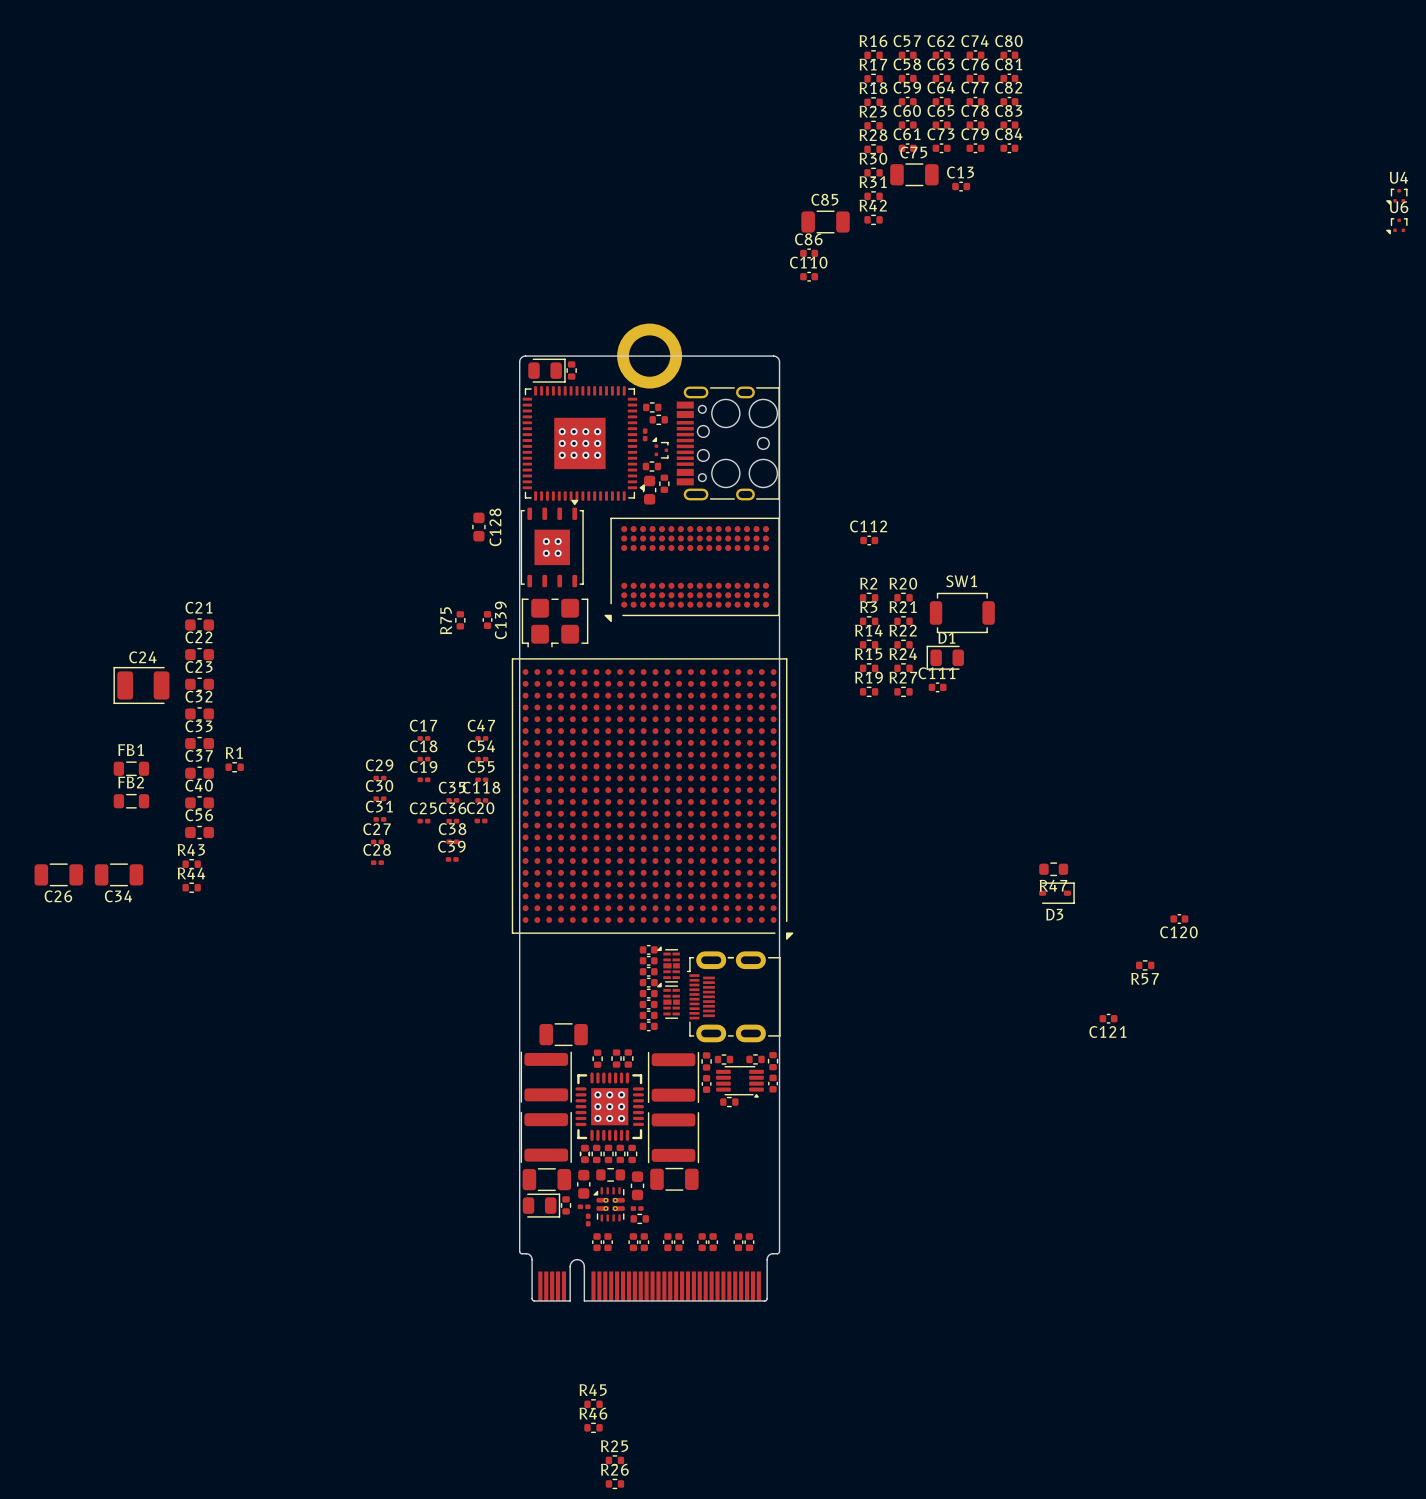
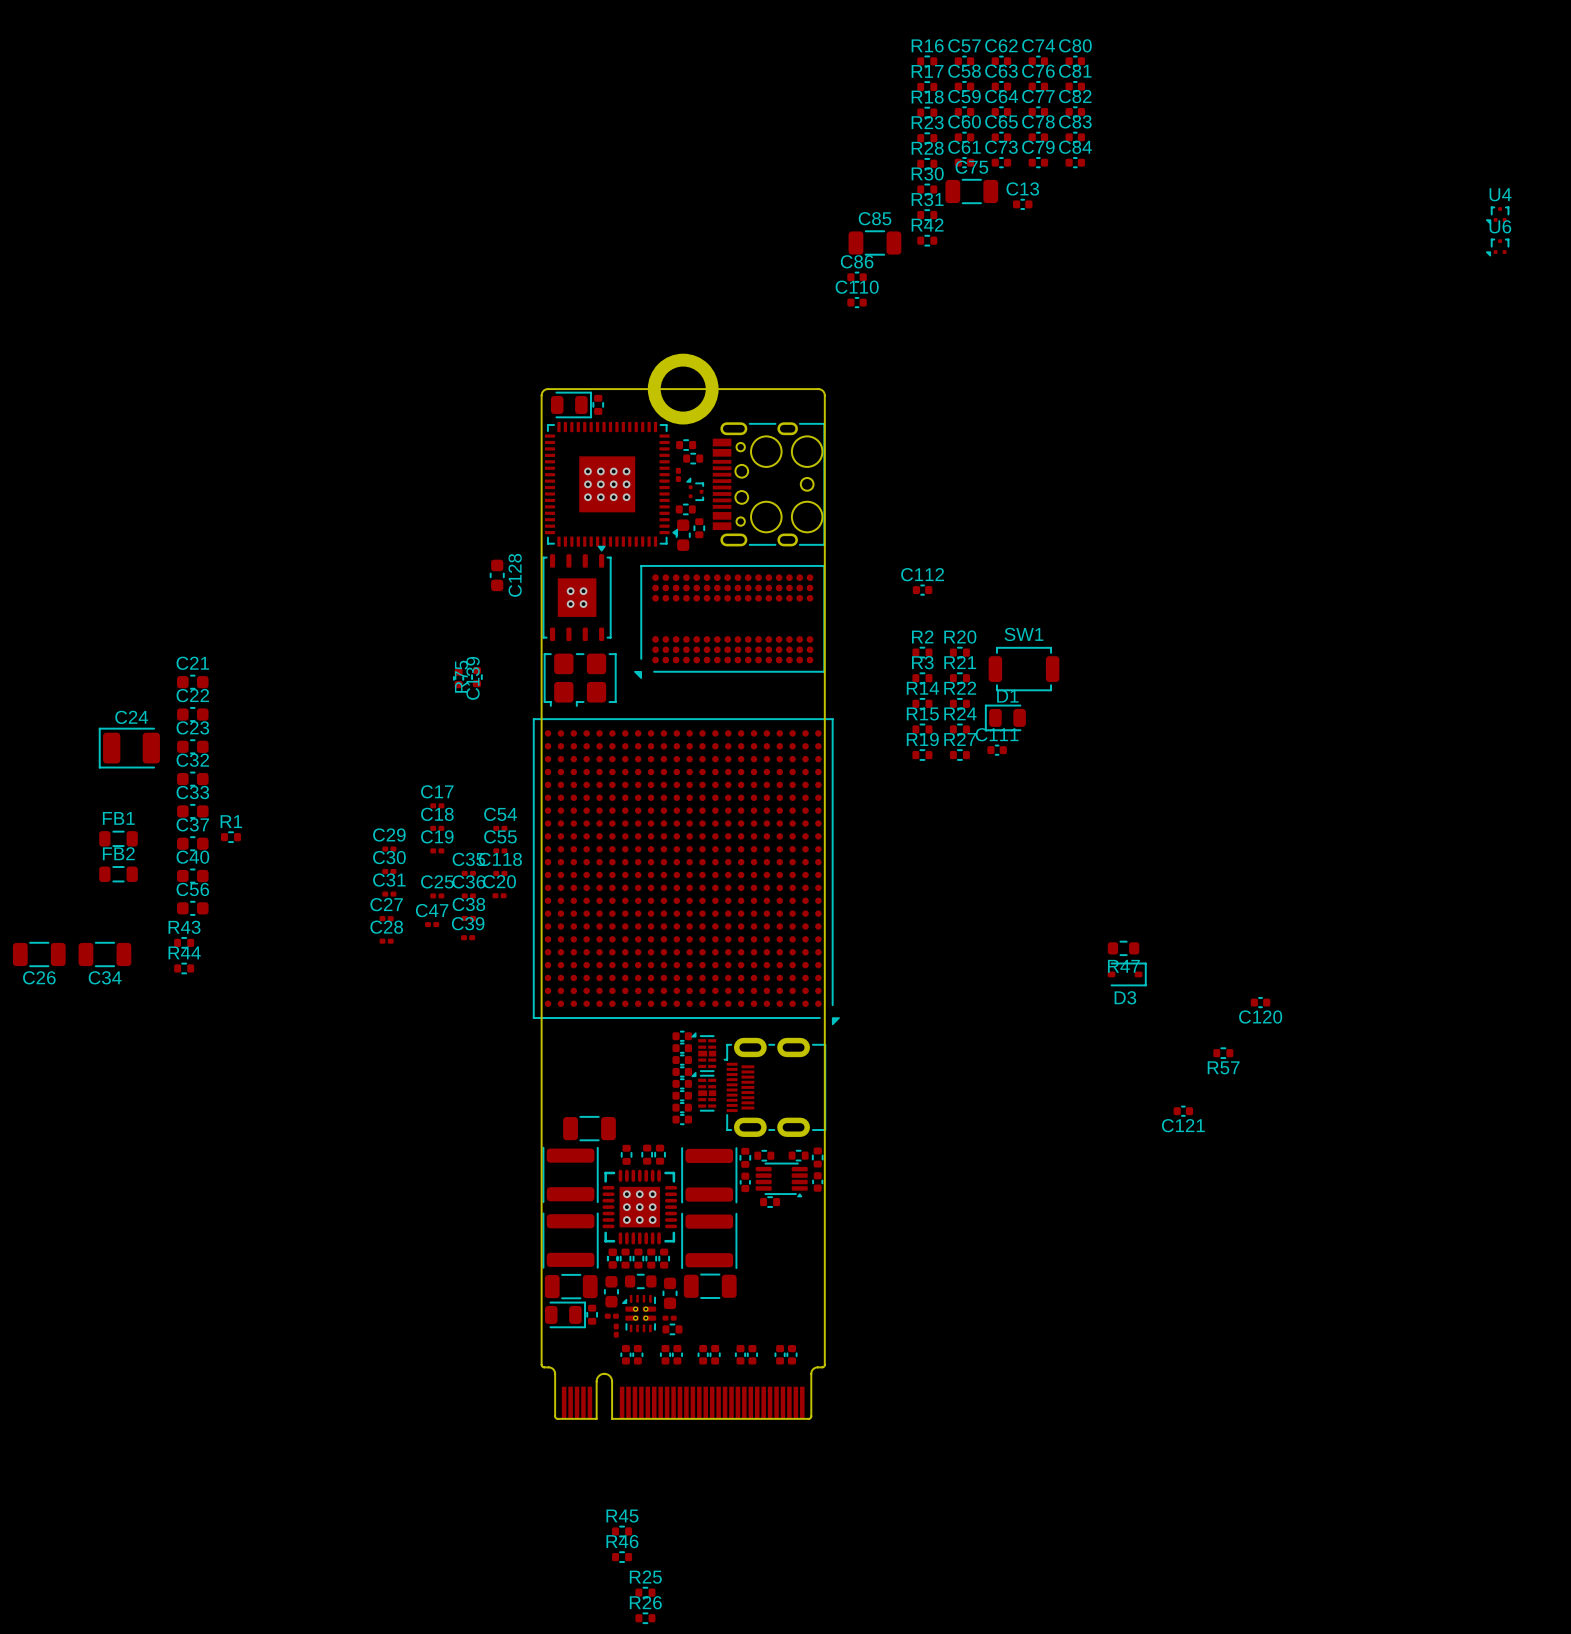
C139 position: (487, 619) -> (458, 678)
C47 position: (481, 738) -> (432, 924)

